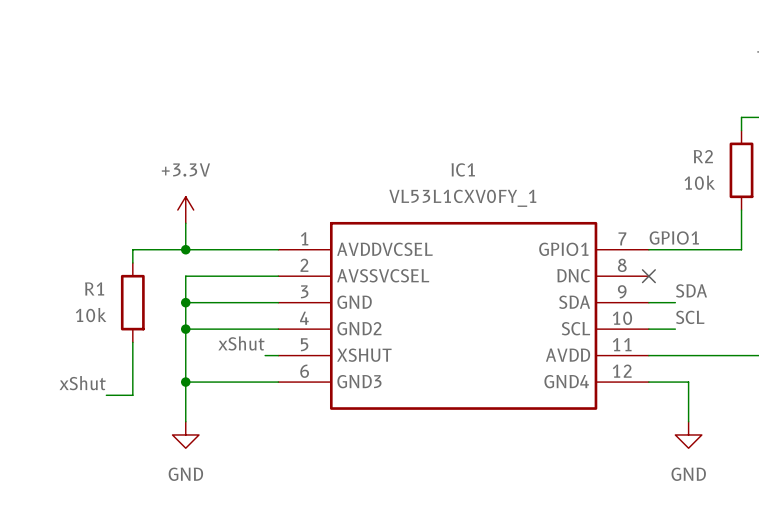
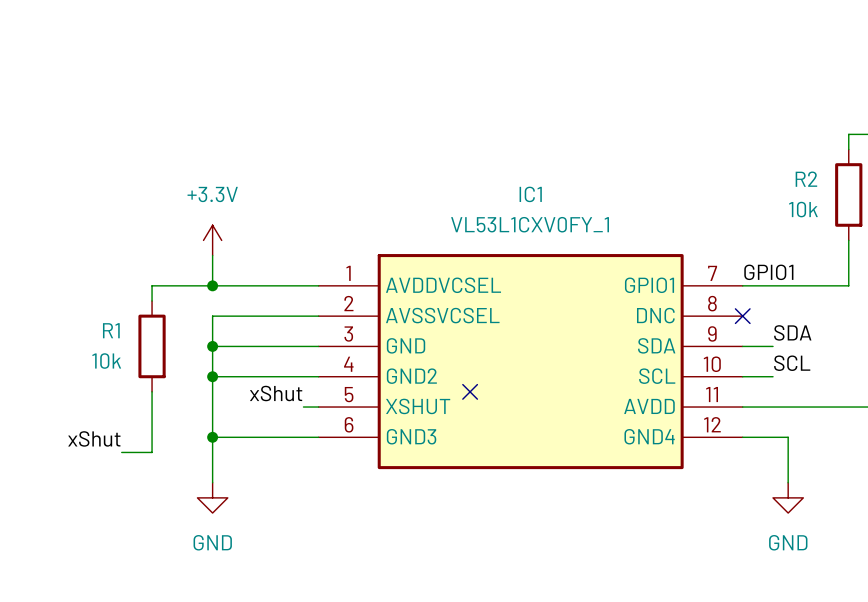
no-connect mark: none -> (470, 391)

